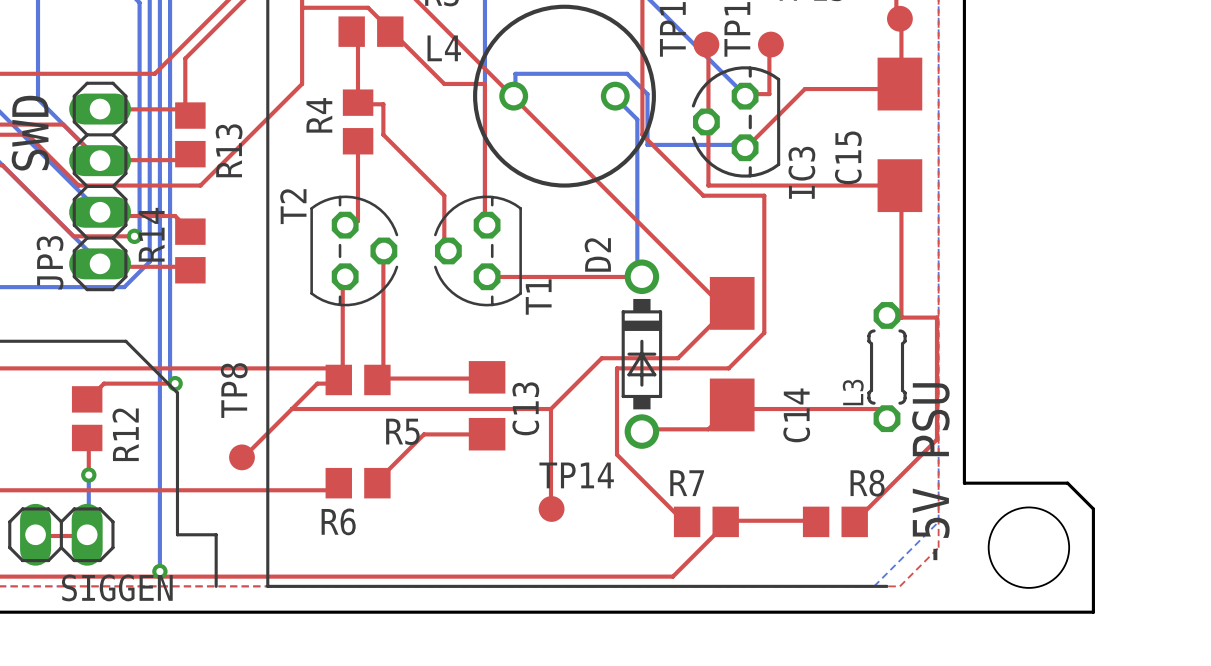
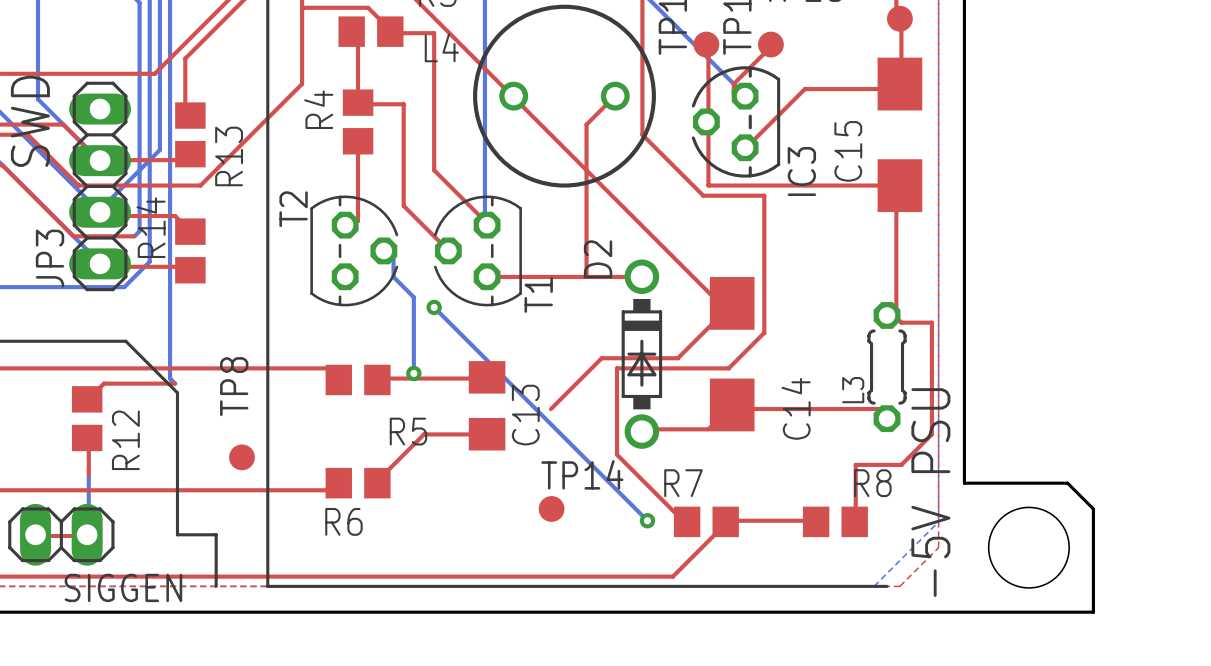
top track: (393, 33) (444, 83) (484, 83) (484, 221) -> (393, 33) (434, 33) (434, 170) (484, 221)
top track: (769, 48) (769, 94) (749, 94) (745, 96) -> (769, 48) (733, 83) (733, 94) (743, 94) (745, 96)
bottom track: (513, 96) (515, 94) (515, 73) (627, 73) (647, 94) (647, 144) (743, 144) (745, 147) -> none
top track: none -> (615, 96) (586, 124) (586, 276)
bottom track: (615, 96) (637, 119) (637, 271) (641, 276) -> none
top track: (383, 104) (383, 134) (444, 195) (444, 246) -> (383, 104) (403, 104) (403, 205) (444, 246)
top track: (100, 109) (185, 109) -> none
bottom track: (159, 149) (159, 571) -> (159, 149) (104, 205) (104, 210) (100, 212)
top track: (899, 185) (901, 317) -> (899, 185) (896, 190) (896, 312) (891, 312) (887, 315)
via: (134, 236) -> none
top track: (383, 250) (383, 378) (377, 379) -> none
bottom track: none -> (383, 250) (388, 251) (393, 256) (393, 276) (413, 297) (413, 373)
top track: (345, 276) (342, 276) (342, 378) (338, 379) (337, 383) (317, 383) (241, 457) -> none
bottom track: none -> (434, 307) (647, 520)
via: none -> (434, 307)
top track: (896, 317) (936, 317) (936, 439) (855, 520) -> (896, 317) (901, 322) (931, 322) (931, 434) (901, 464) (855, 464) (855, 520)
via: none -> (413, 373)
via: (175, 383) -> none
top track: (291, 409) (550, 409) (551, 508) -> none
via: (88, 475) -> none
via: none -> (647, 520)
via: (159, 571) -> none

